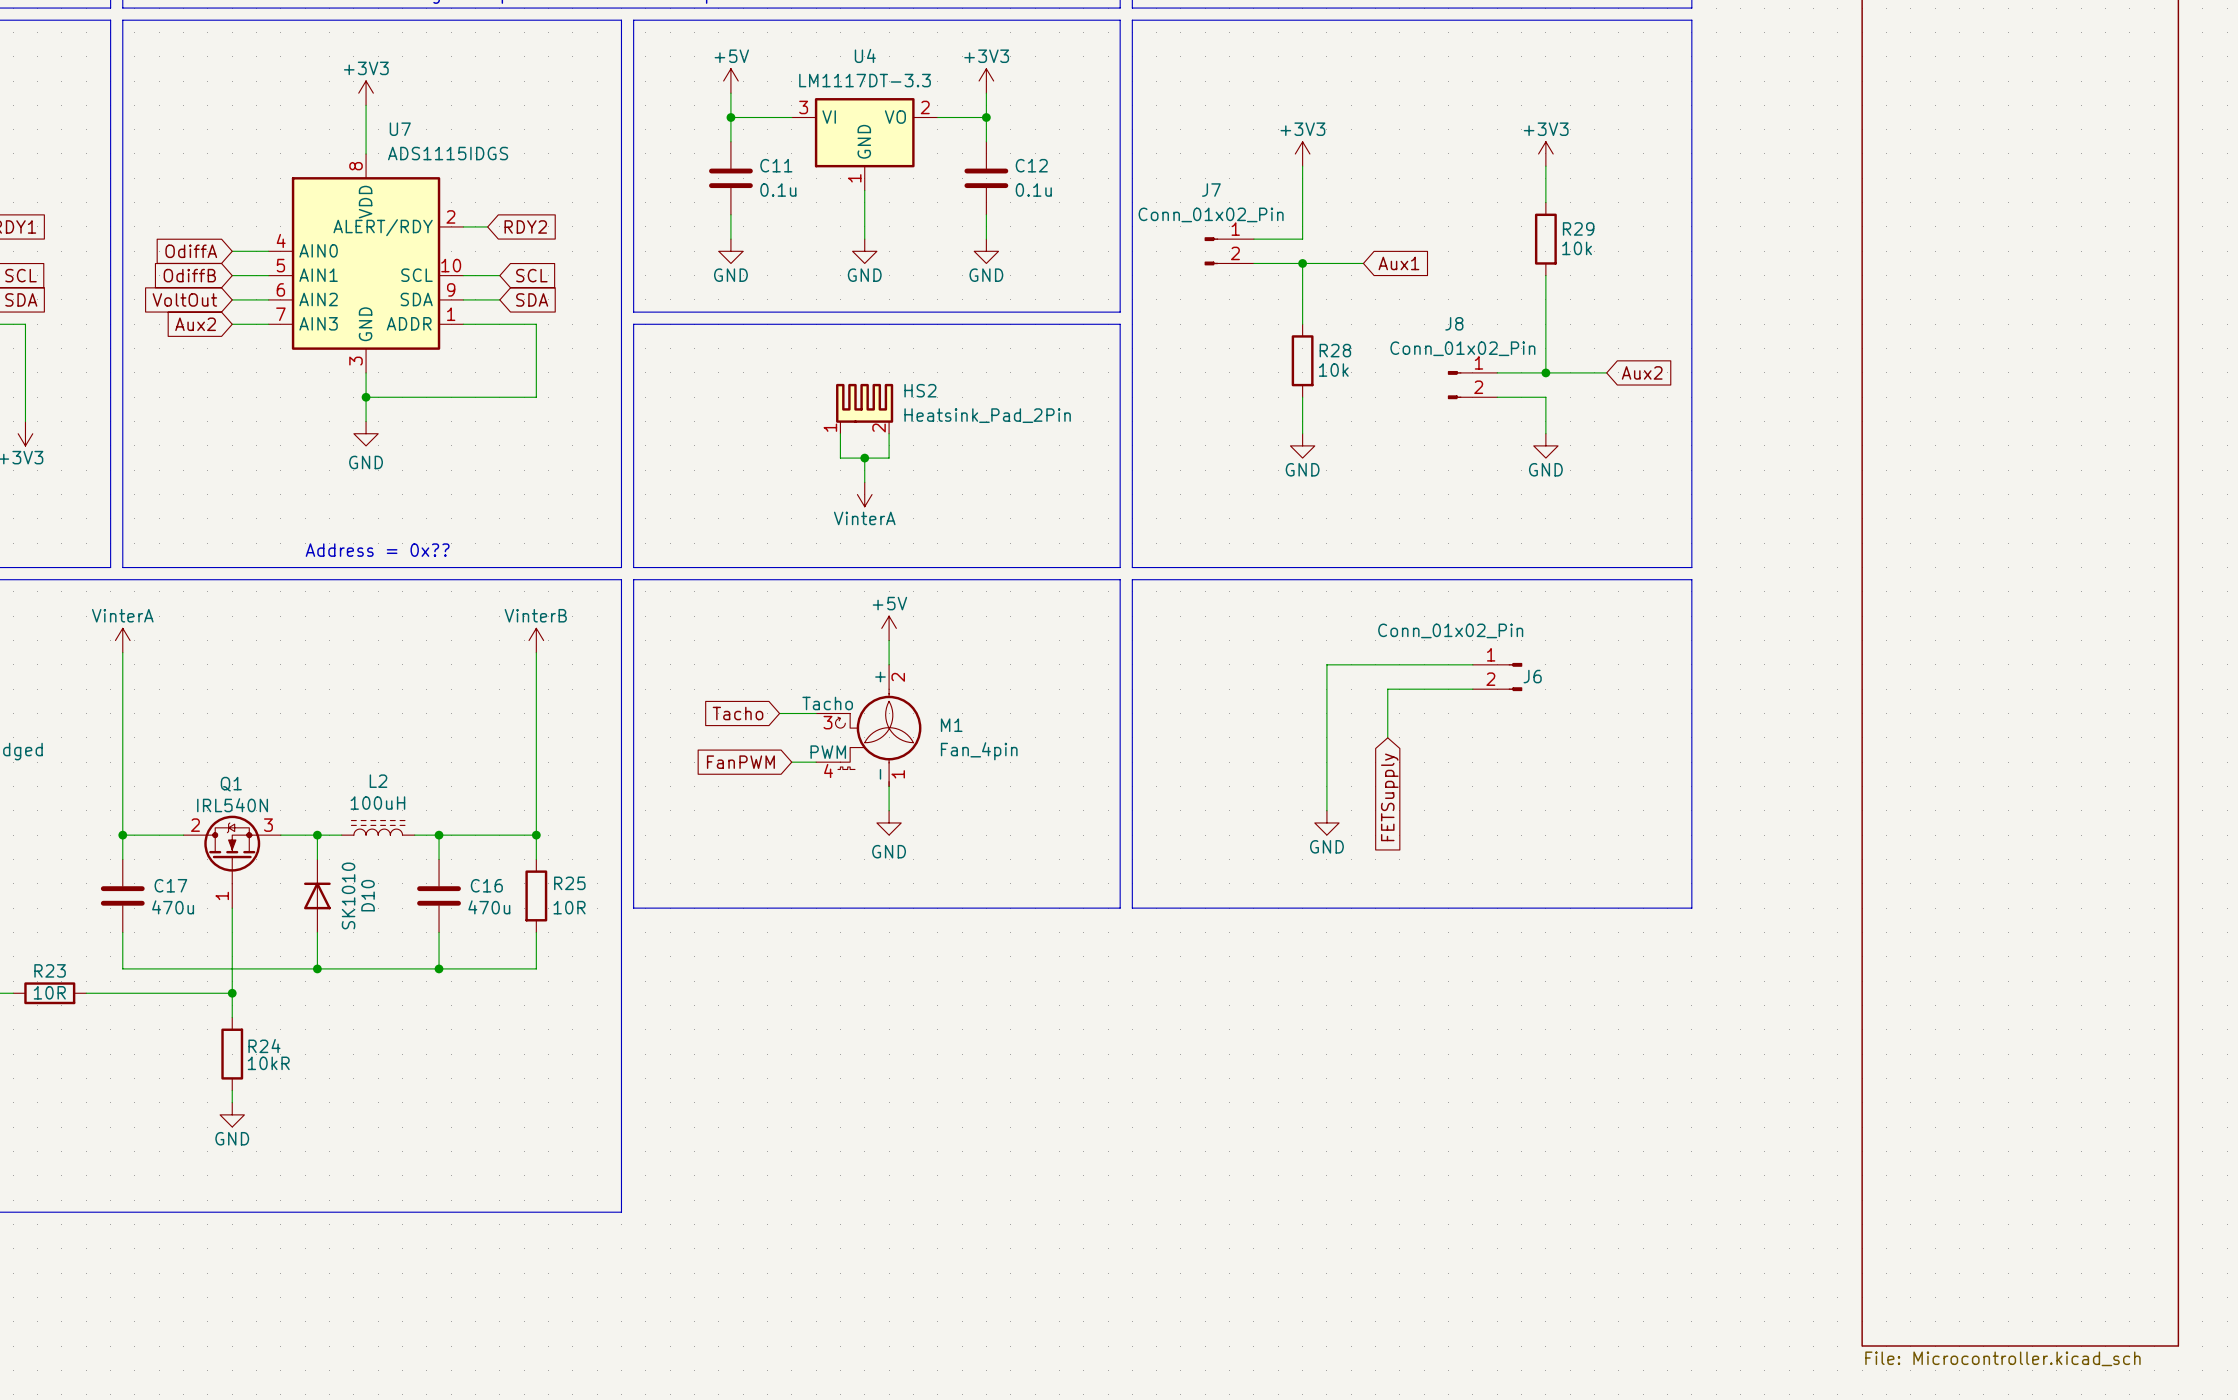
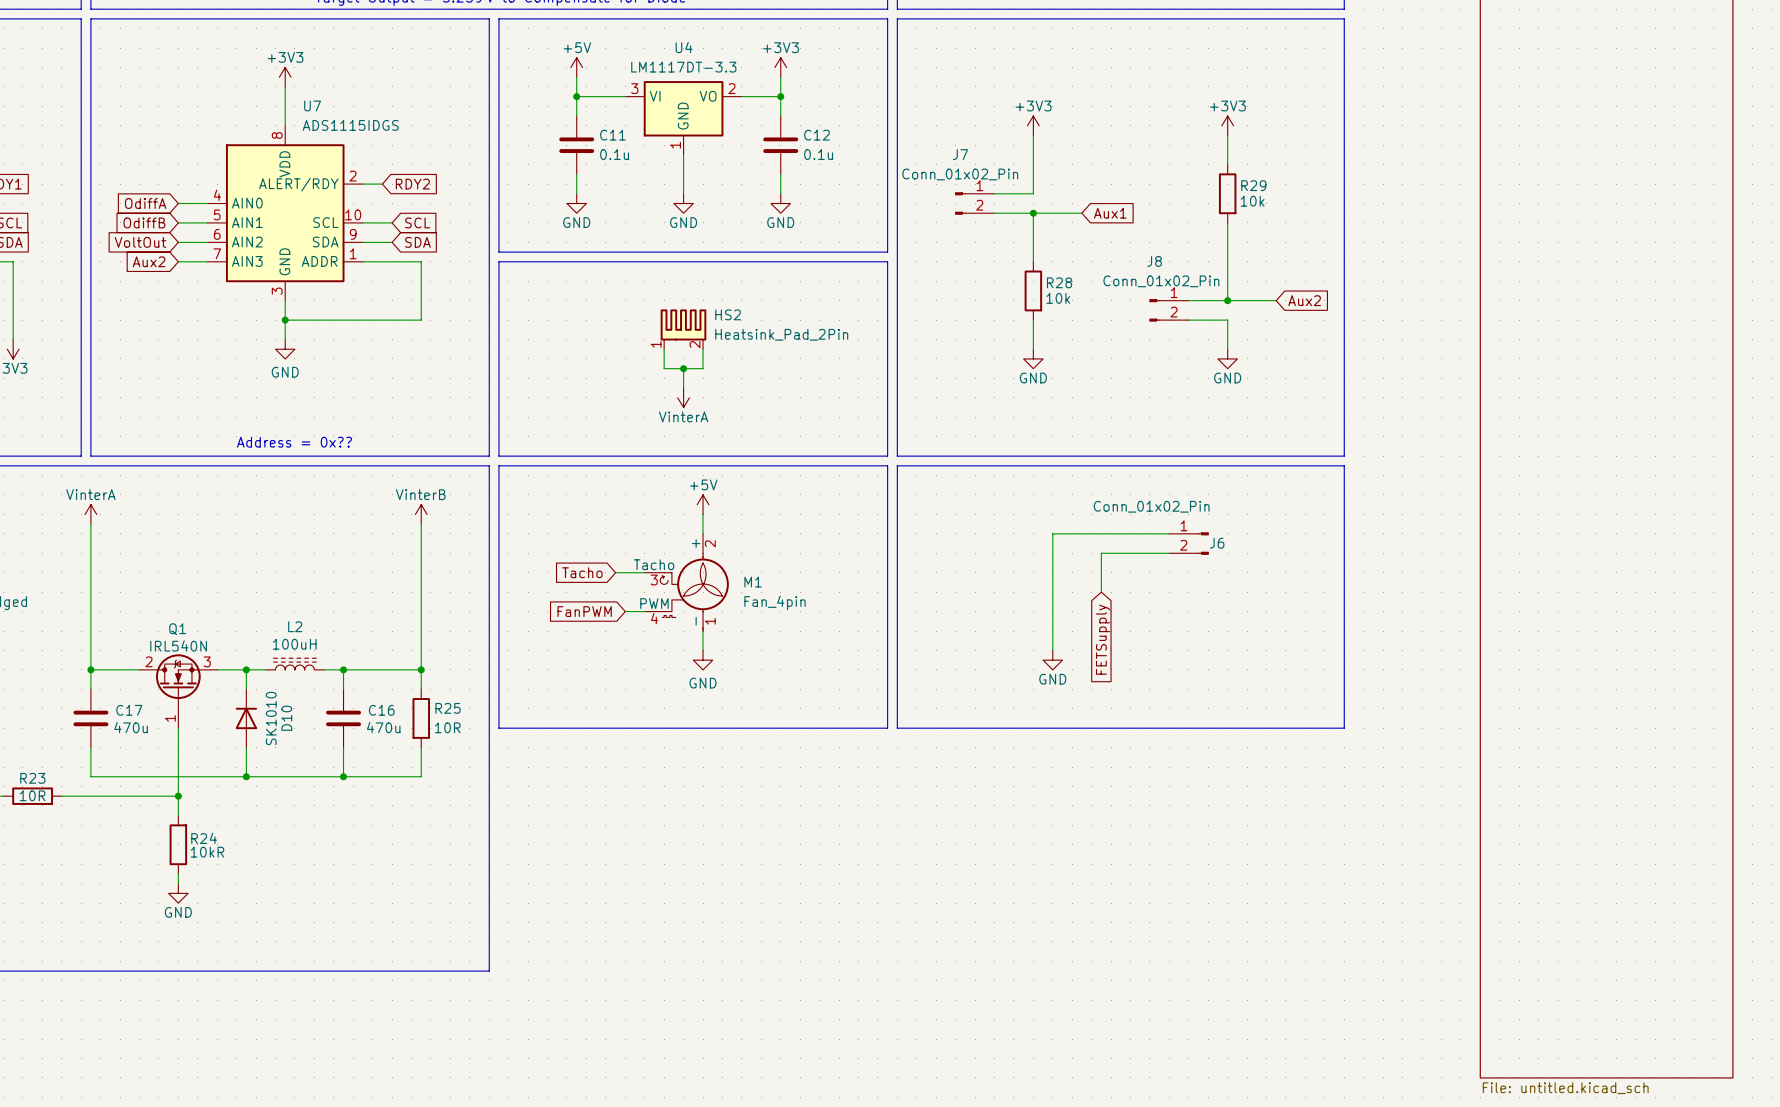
sheet value: File: Microcontroller.kicad_sch (2002, 1358) -> File: untitled.kicad_sch (1565, 1088)

